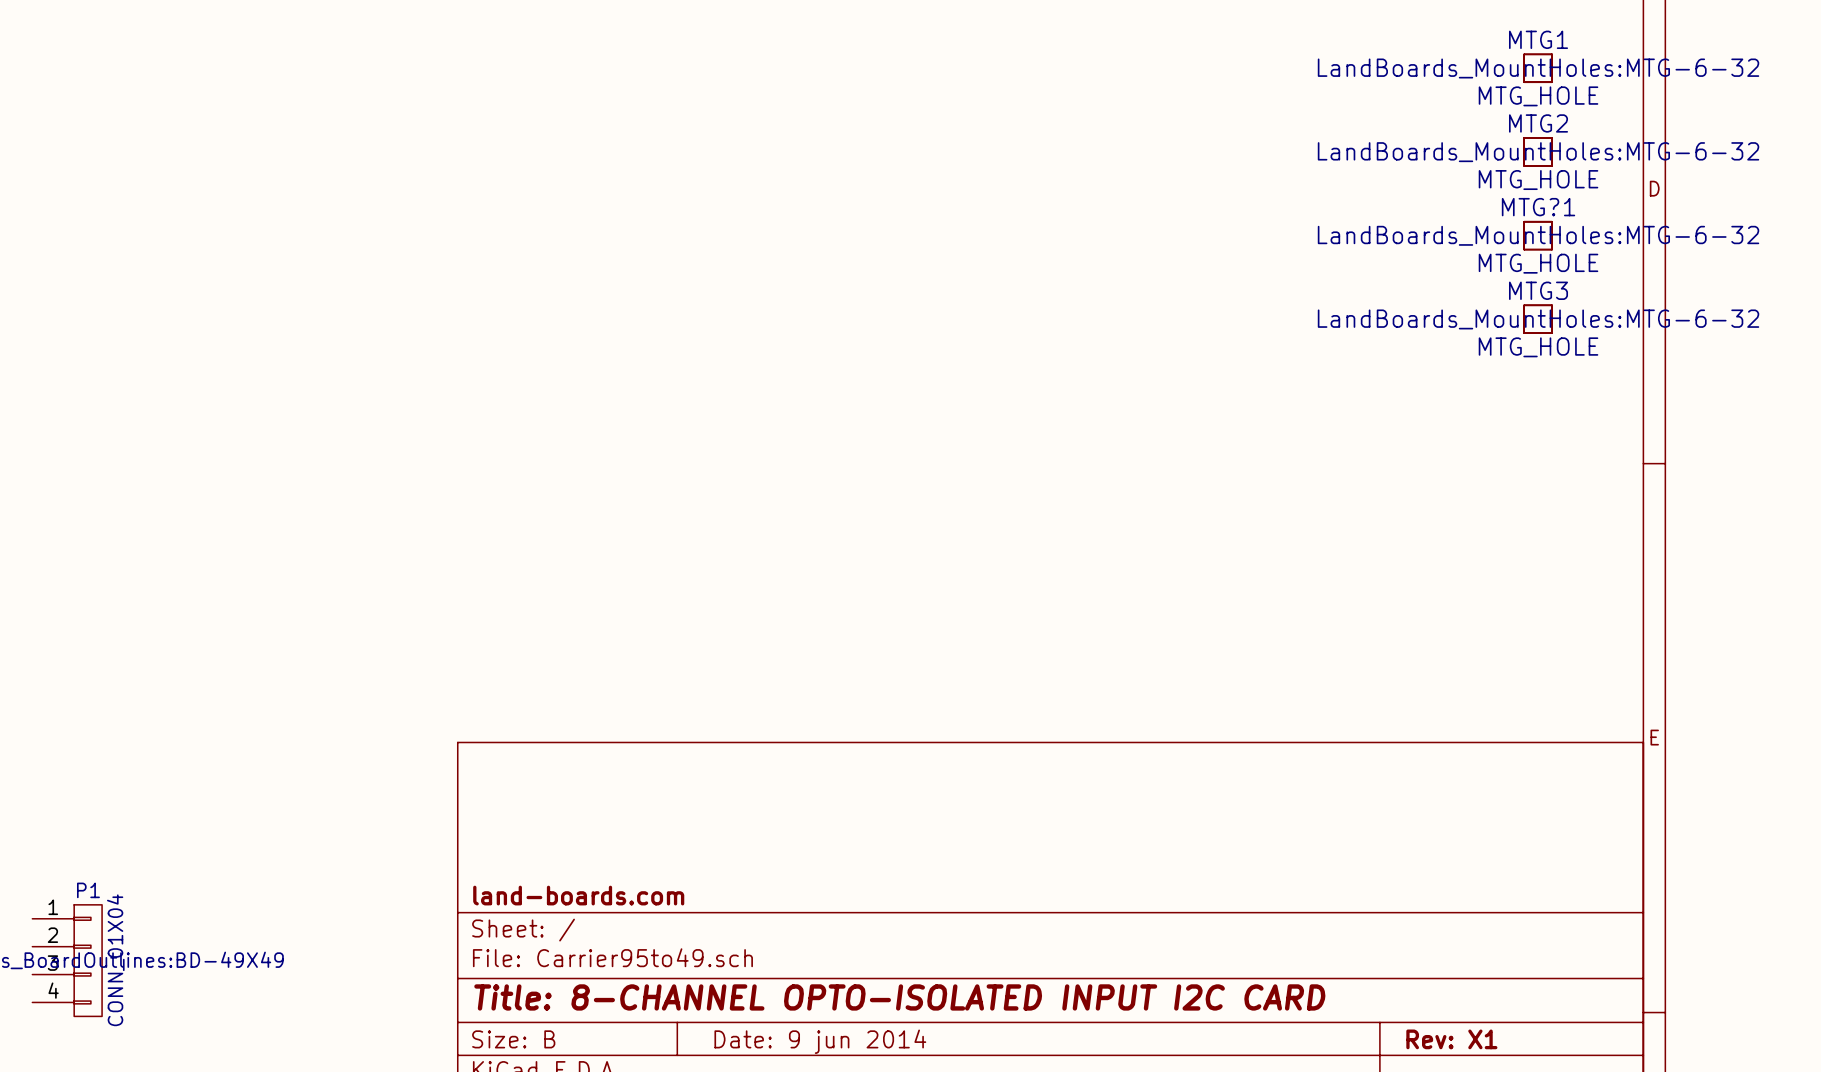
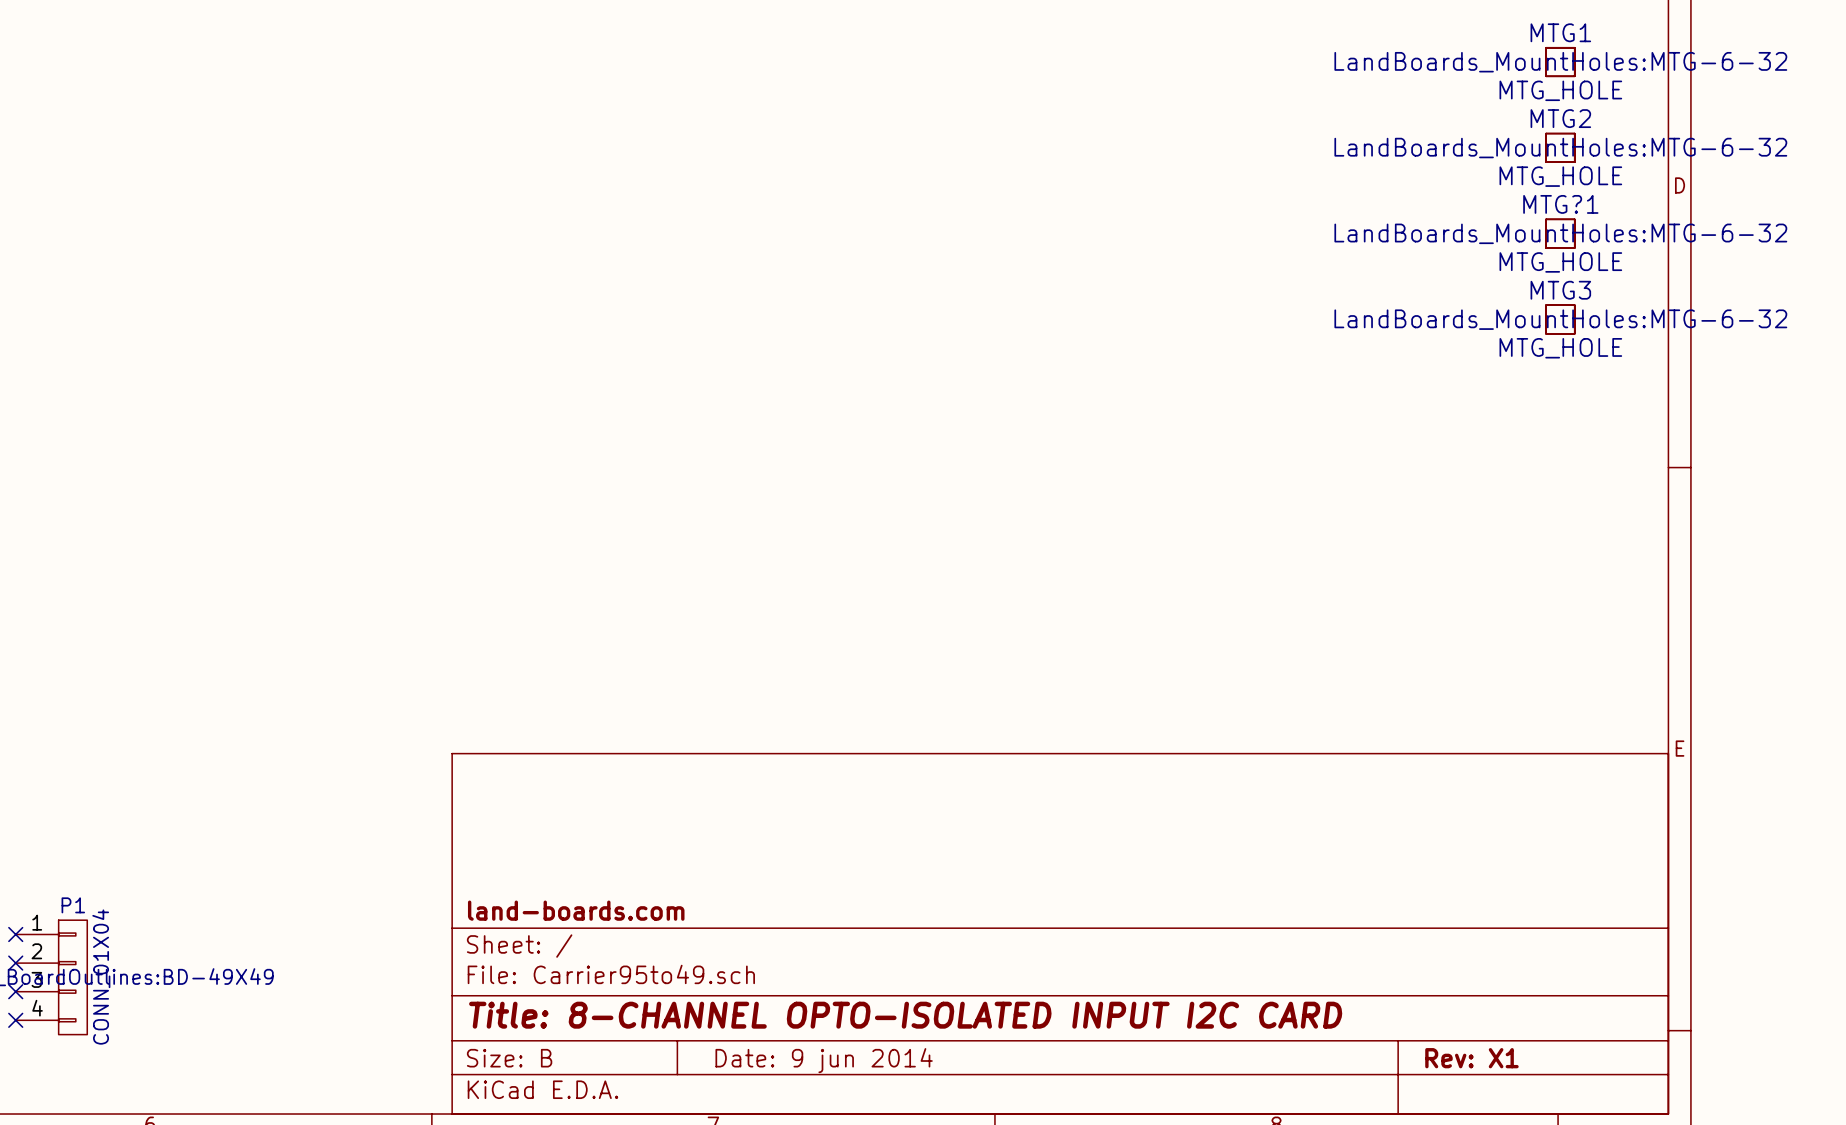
no-connect mark: none -> (15, 934)
no-connect mark: none -> (15, 963)
no-connect mark: none -> (15, 991)
no-connect mark: none -> (15, 1020)

